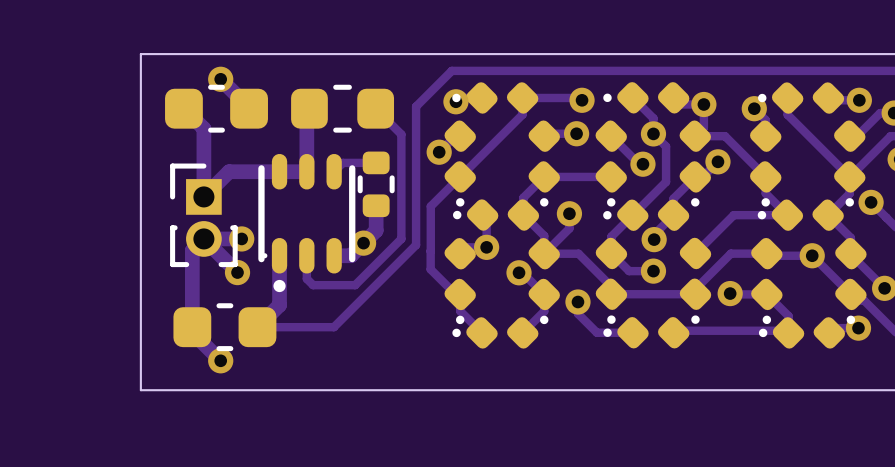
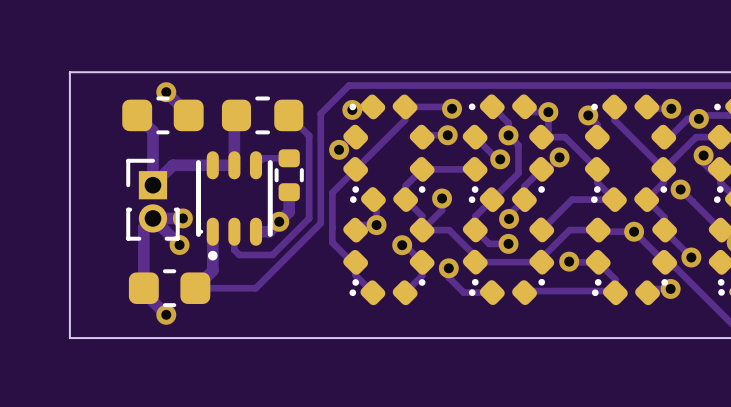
board edge: (140, 54) (140, 390) -> (103, 72) (69, 72) (69, 338) (103, 338)

